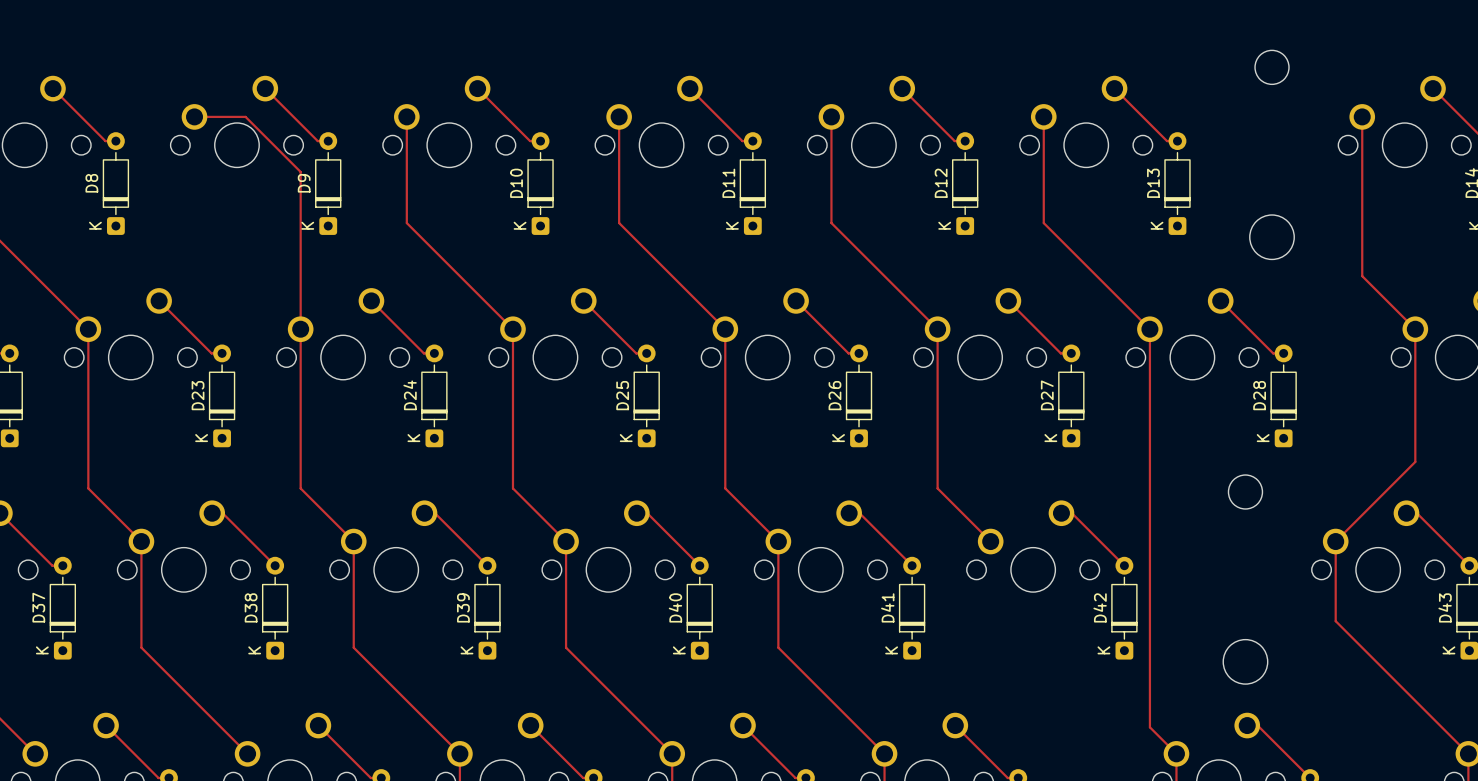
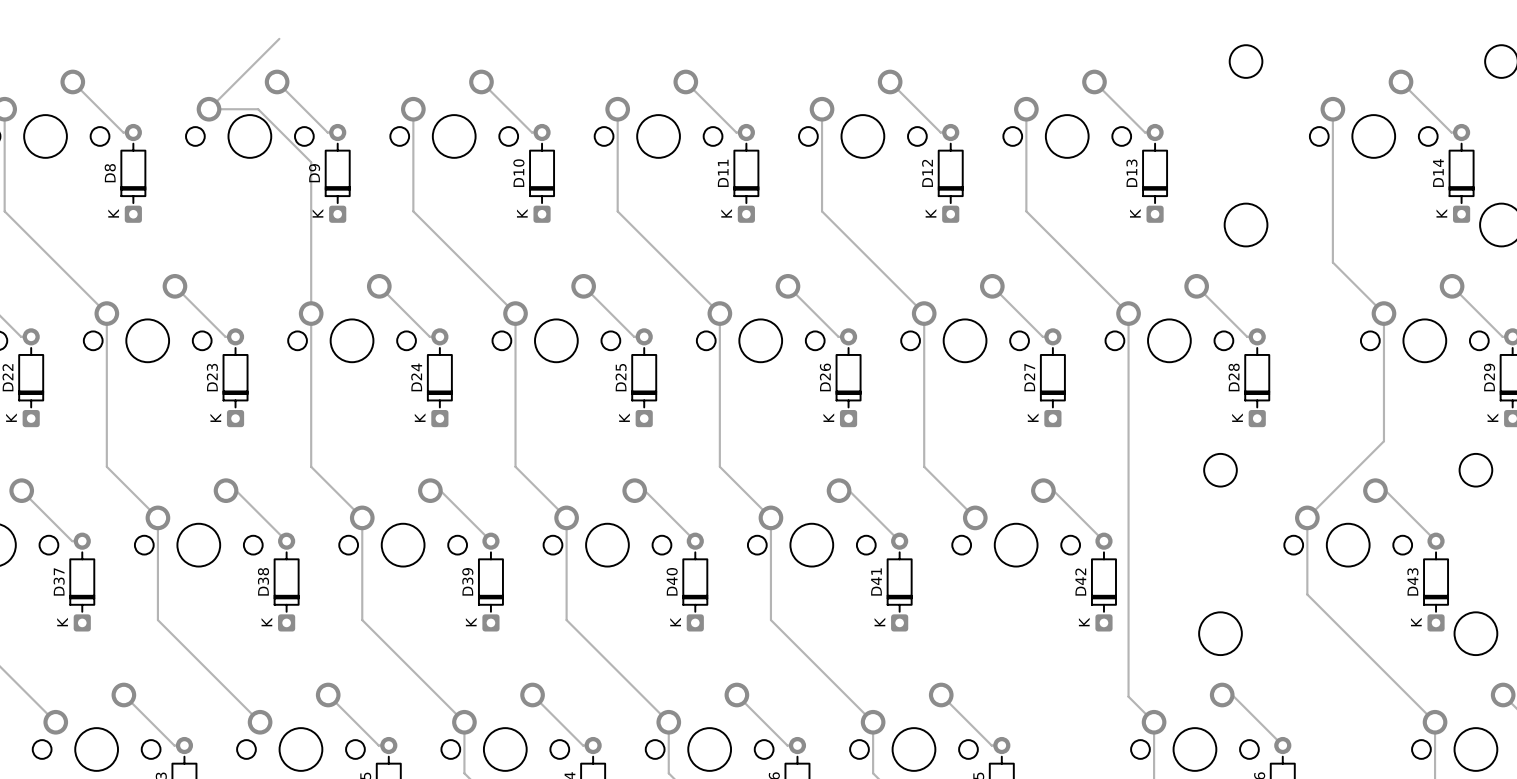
track: none -> (279, 38) (209, 109)

